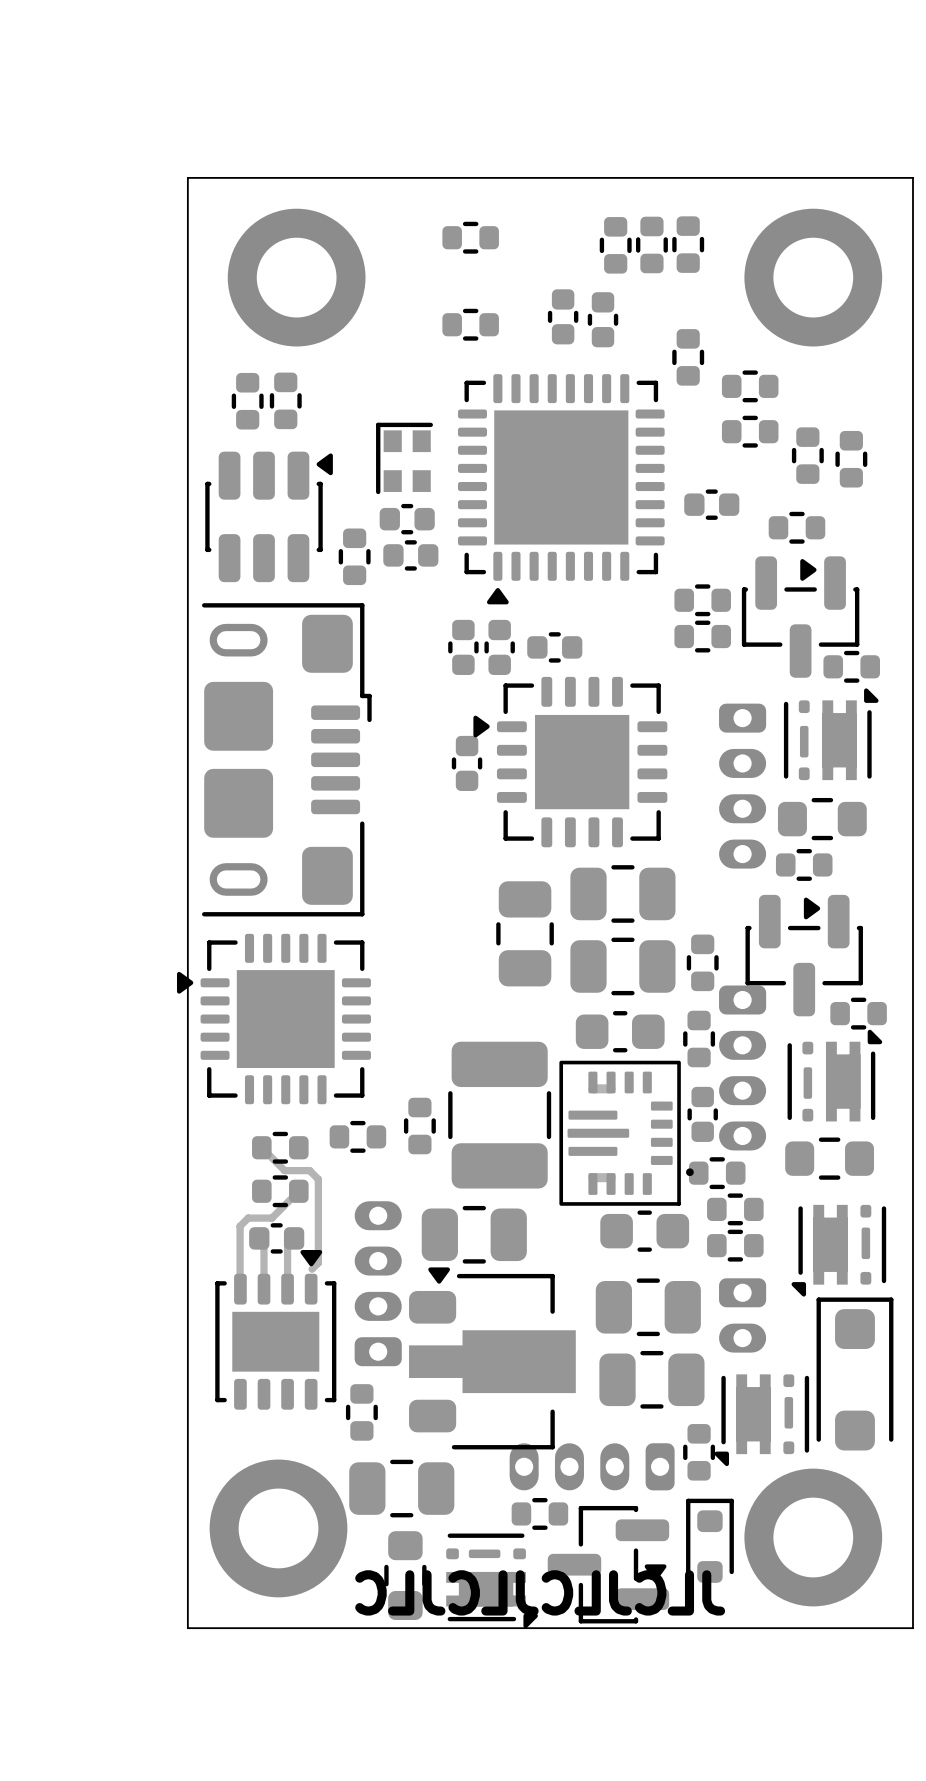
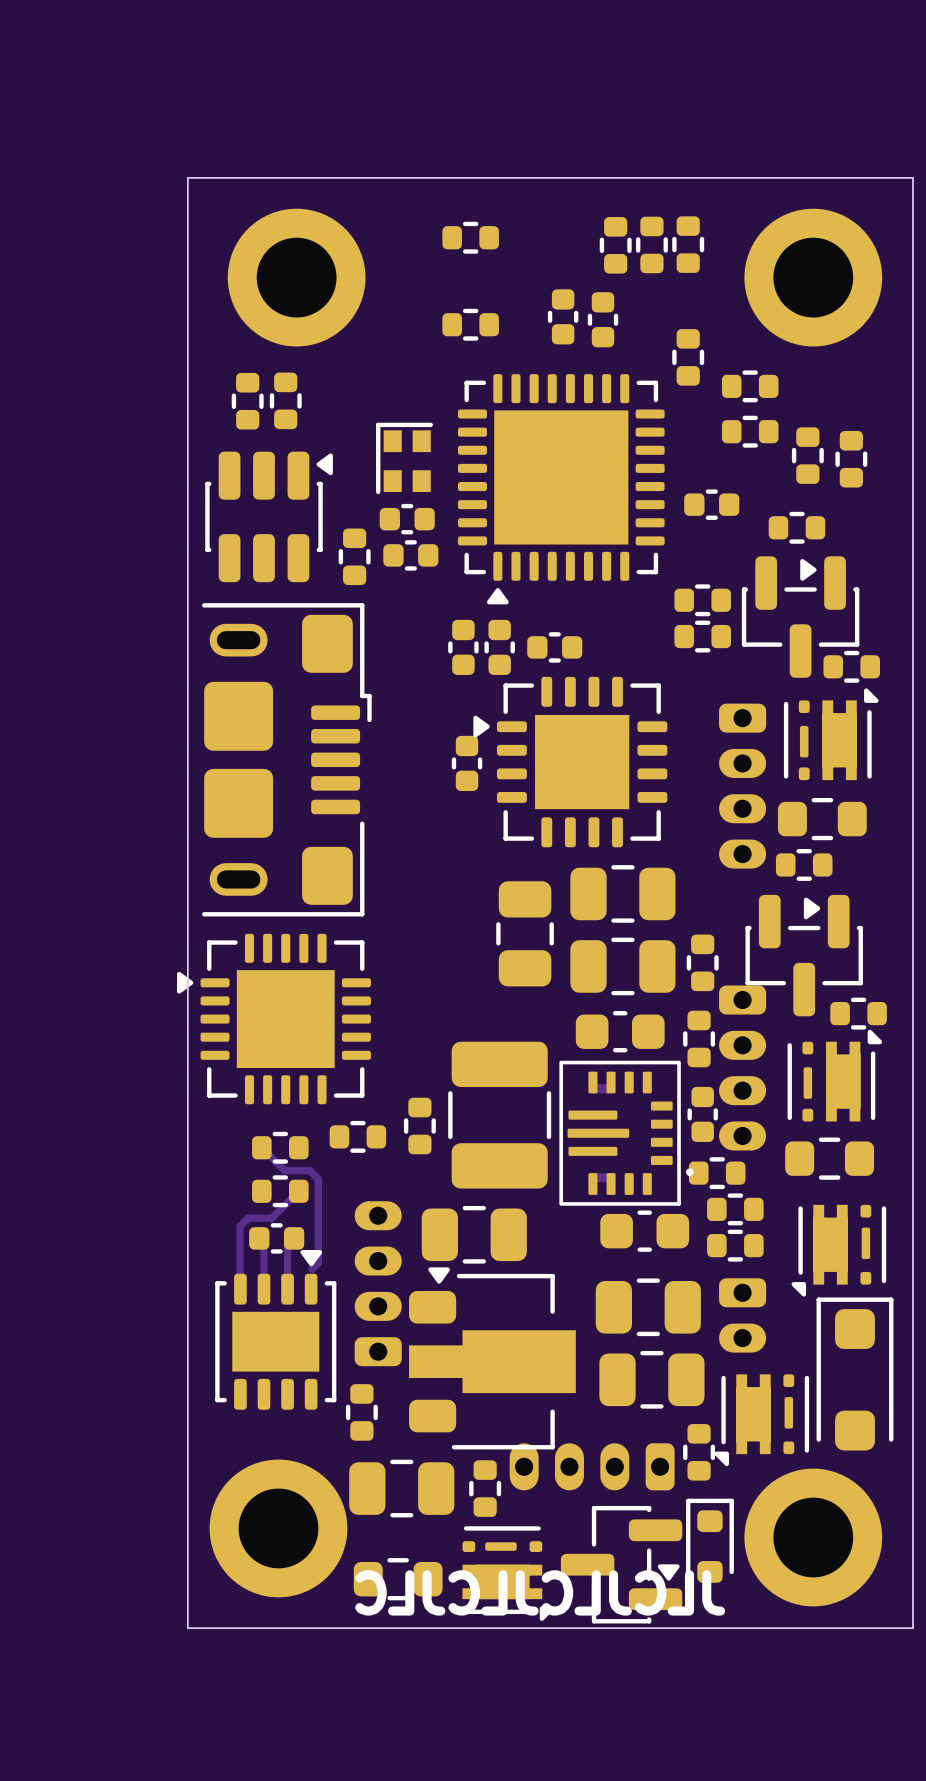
part rotation: 0° (539, 1513) -> 90° clockwise (485, 1488)
part position: (539, 1513) -> (485, 1488)
part position: (608, 1564) -> (621, 1564)
part rotation: 0° (405, 1575) -> 90° clockwise (398, 1579)
part position: (492, 1580) -> (508, 1573)

